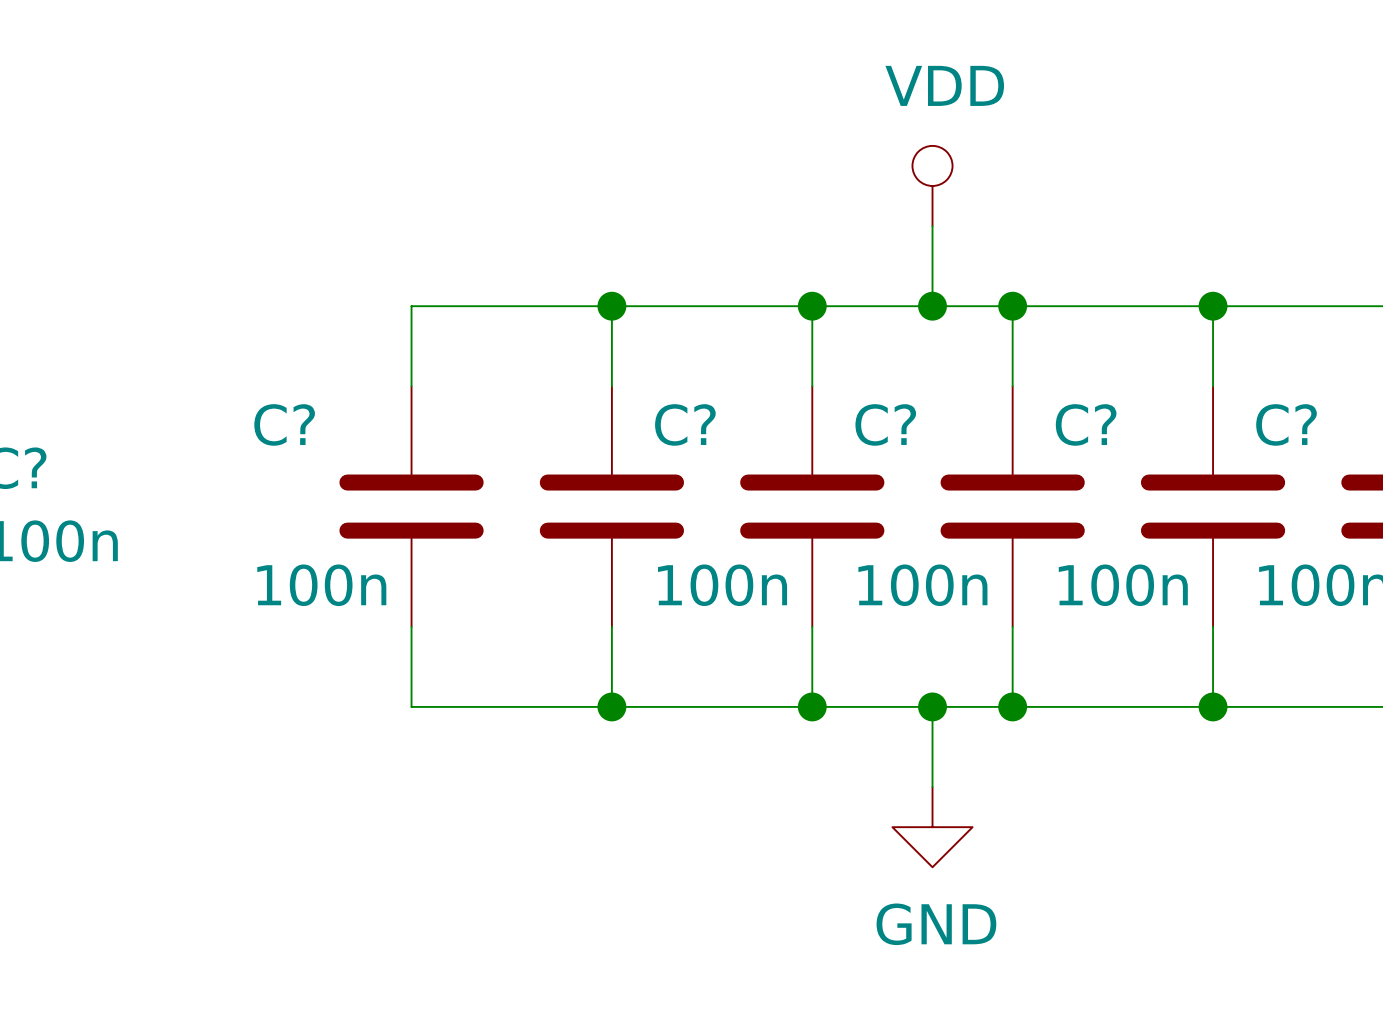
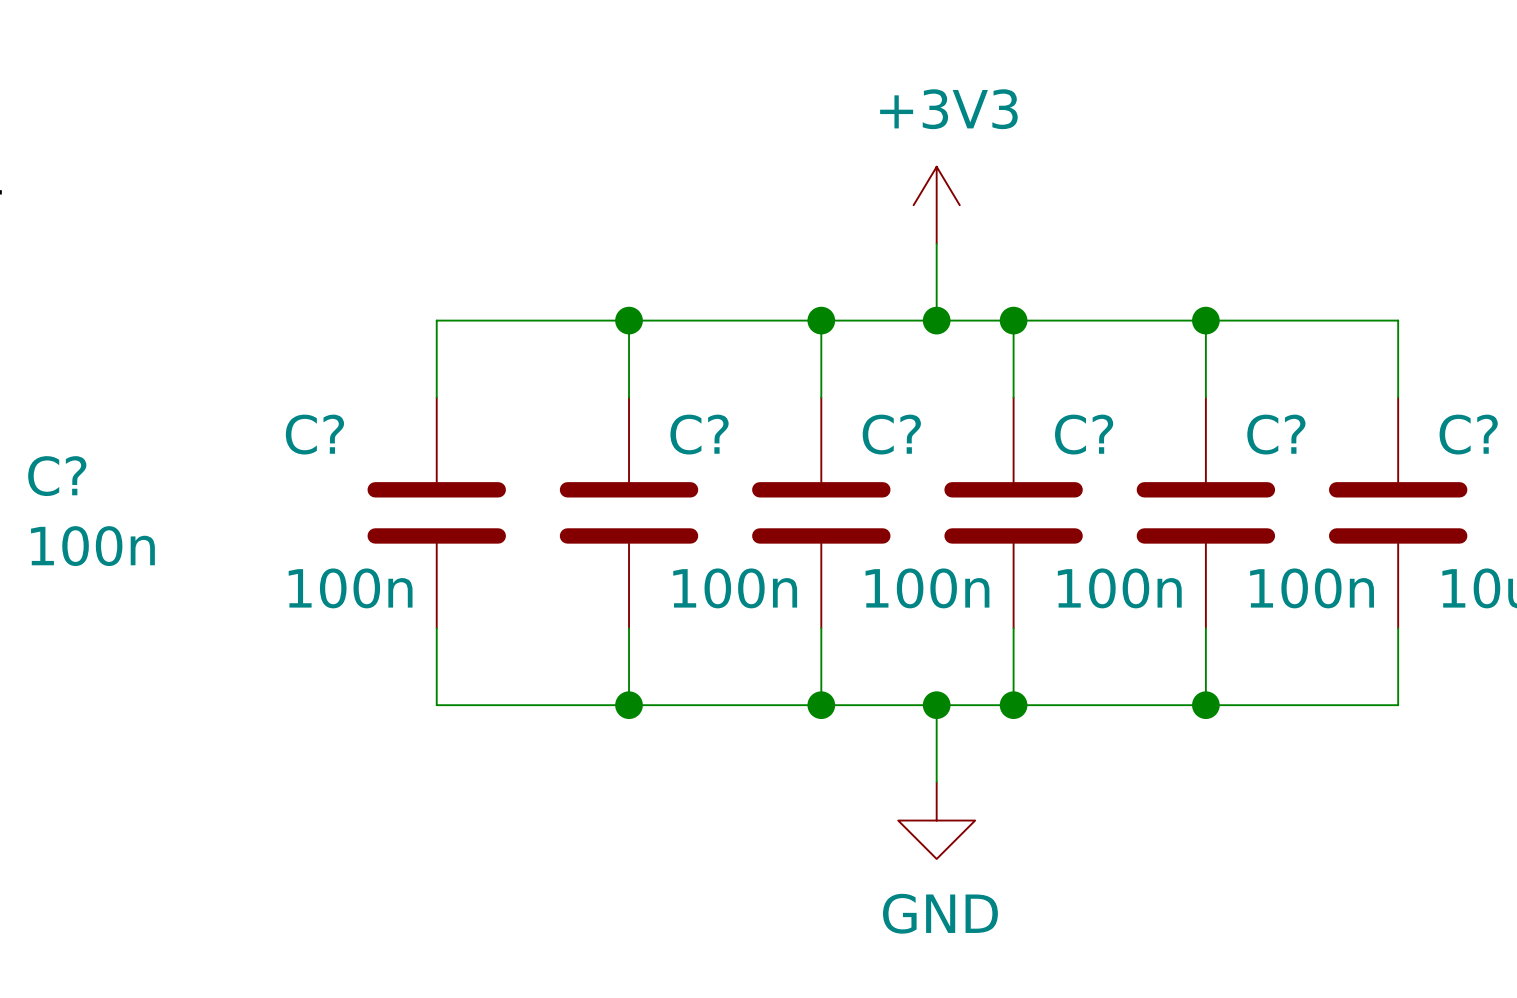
power symbol: VDD (932, 185) -> +3V3 (936, 205)

